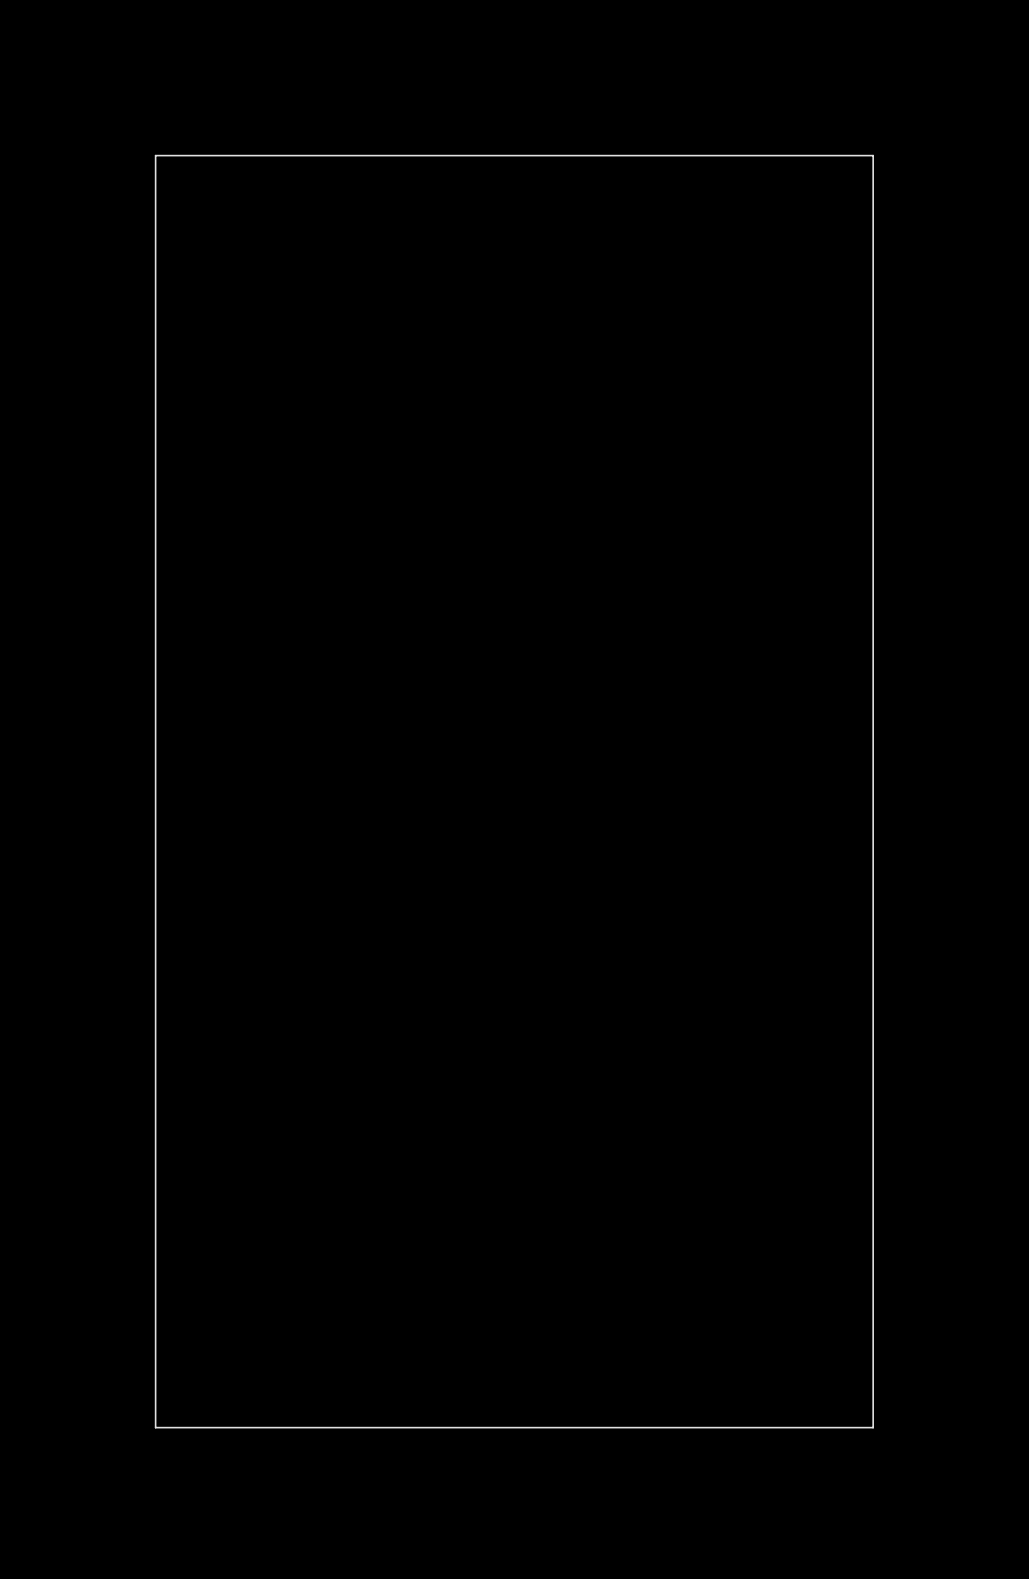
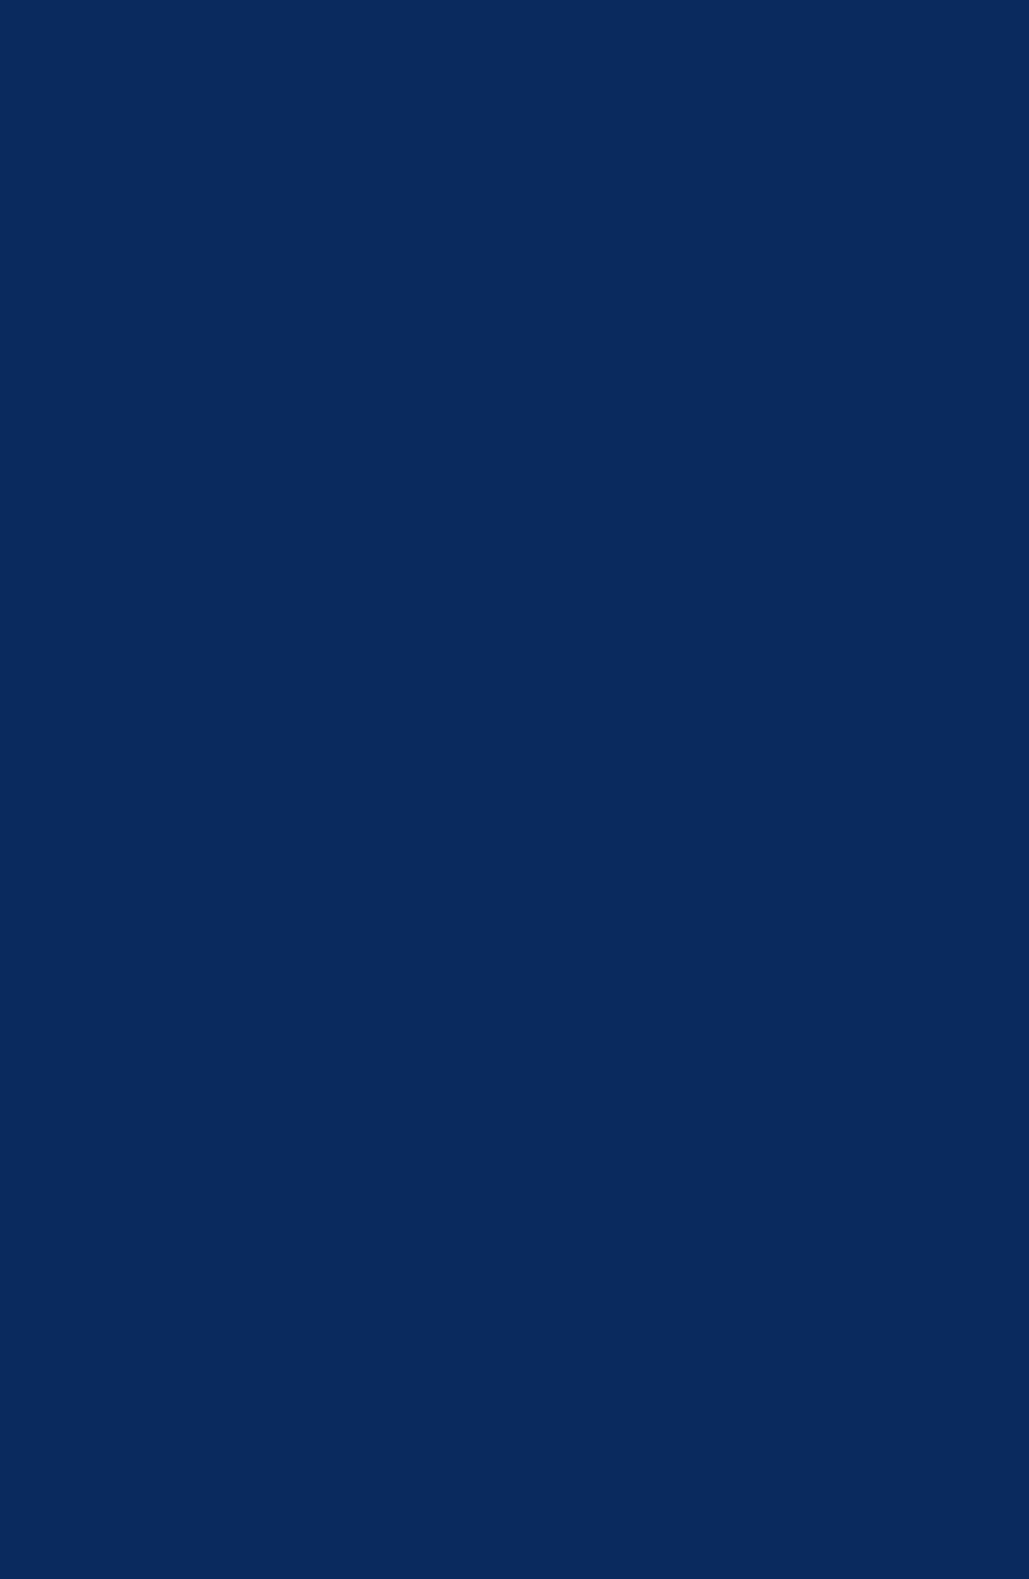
line: (155, 155) (155, 1427) (873, 1427) (873, 155) (155, 155) -> none

